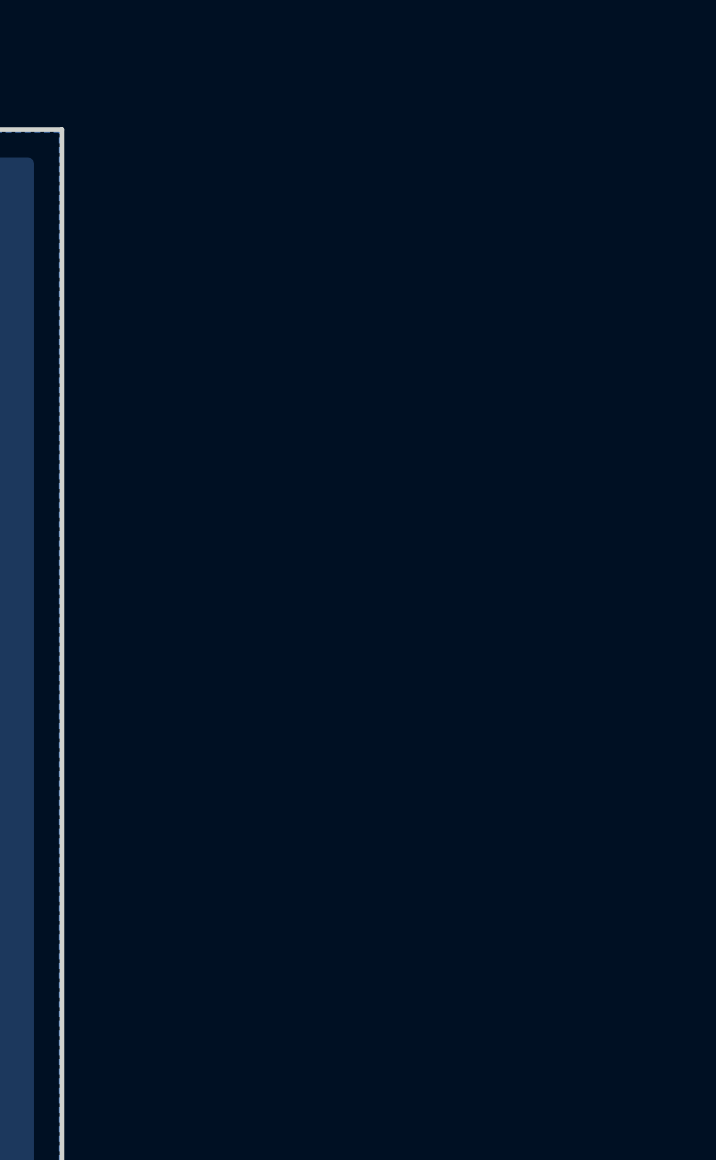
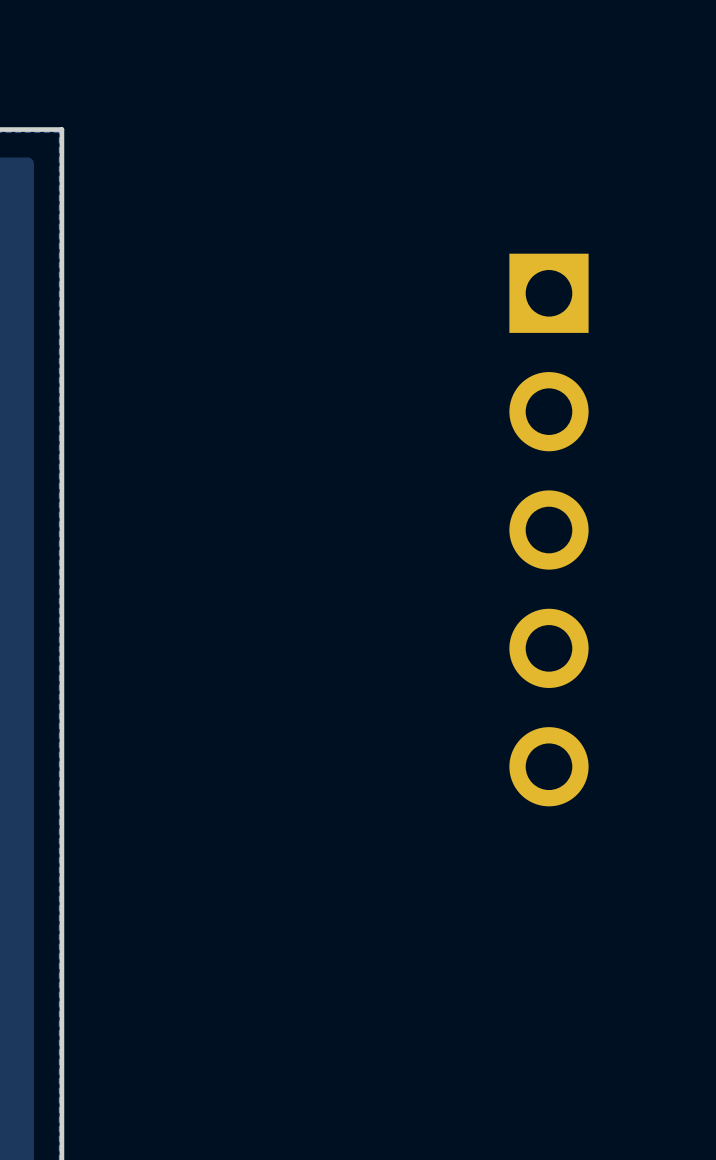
part: none -> (548, 530)

